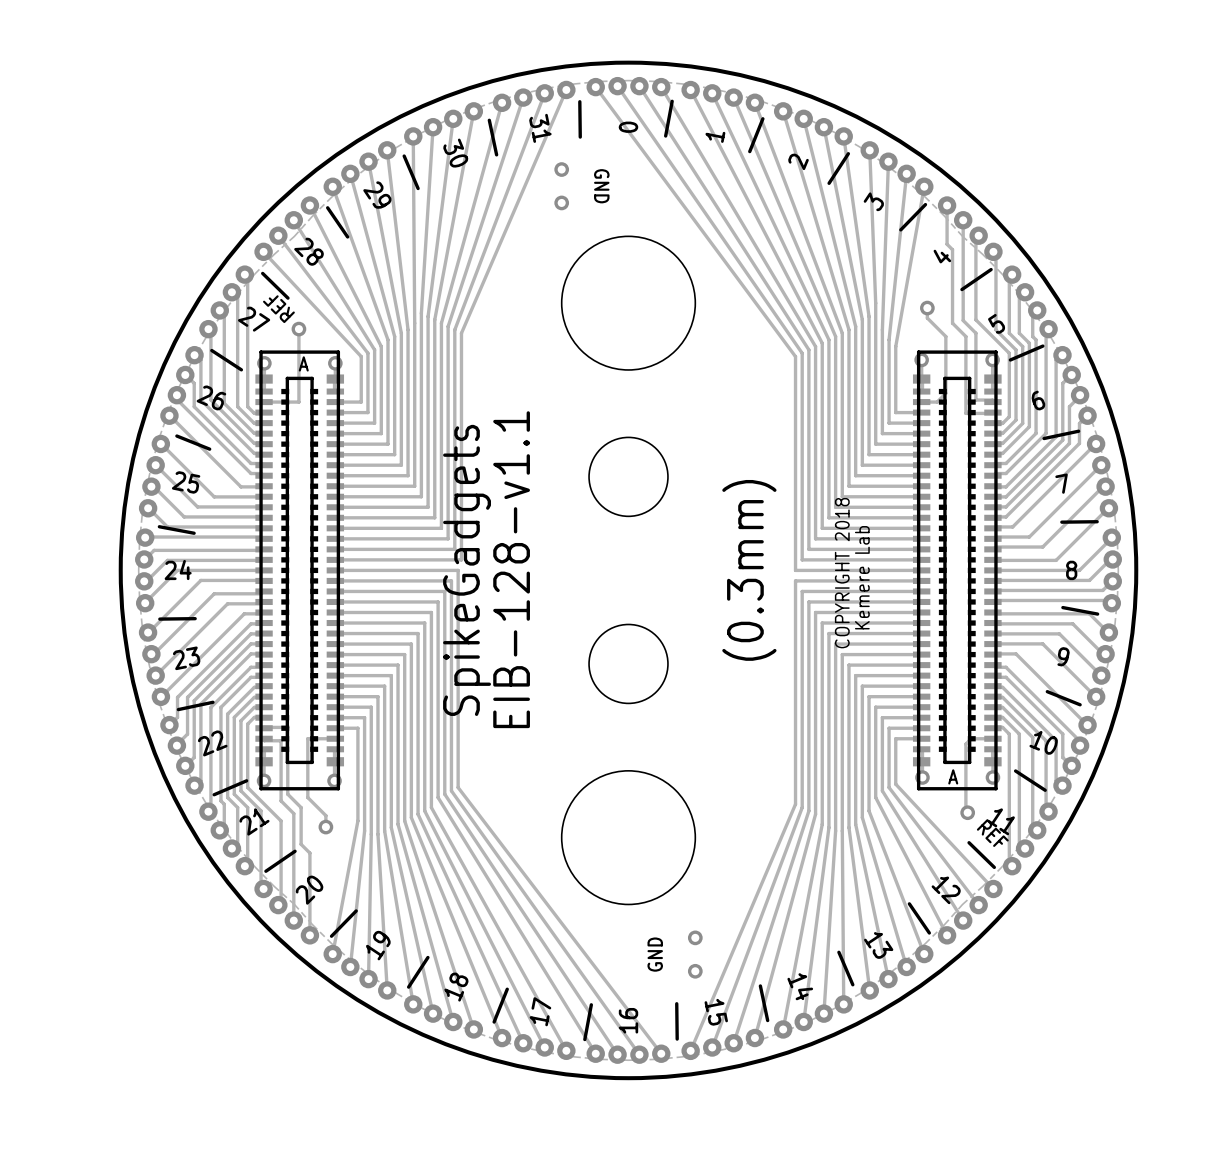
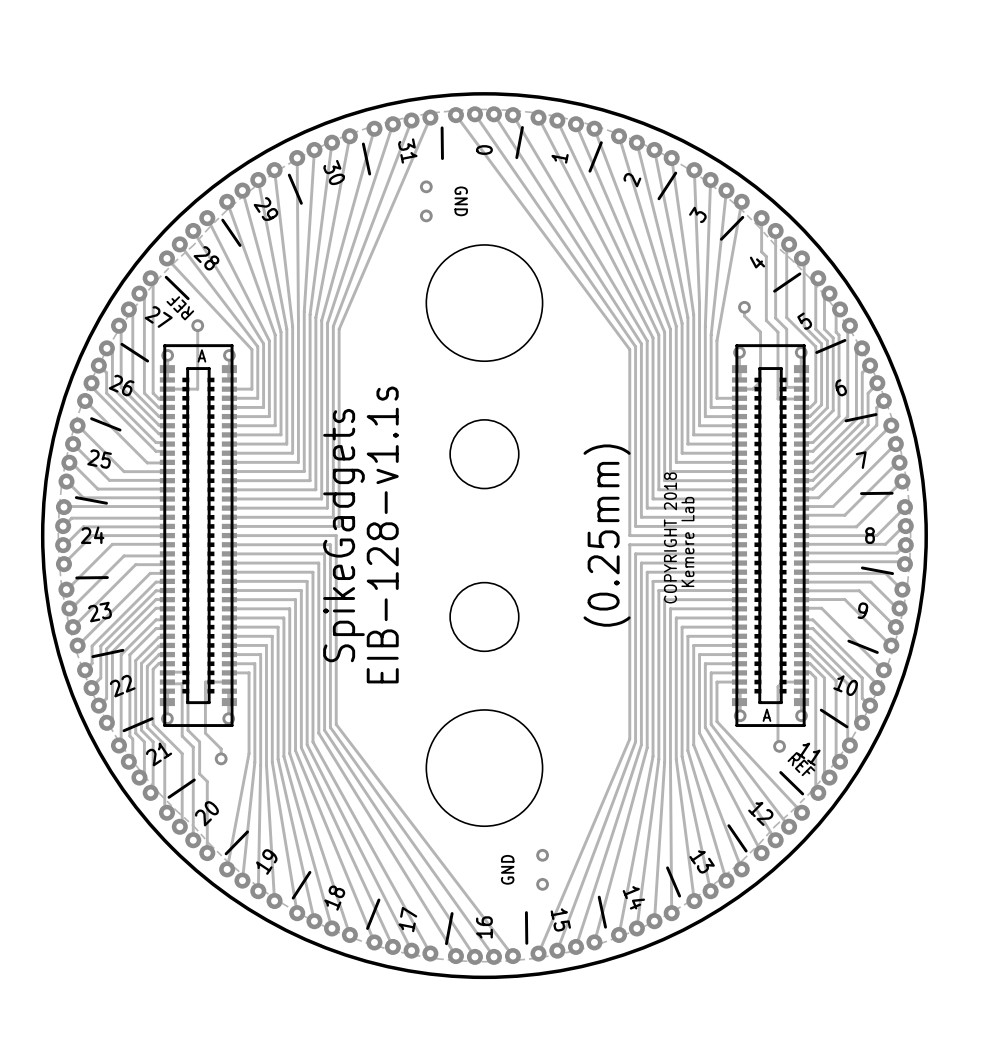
text: EIB-128-v1.1 (511, 569) -> EIB-128-v1.1s (382, 534)
text: (0.3mm) (749, 570) -> (0.25mm) (607, 535)

